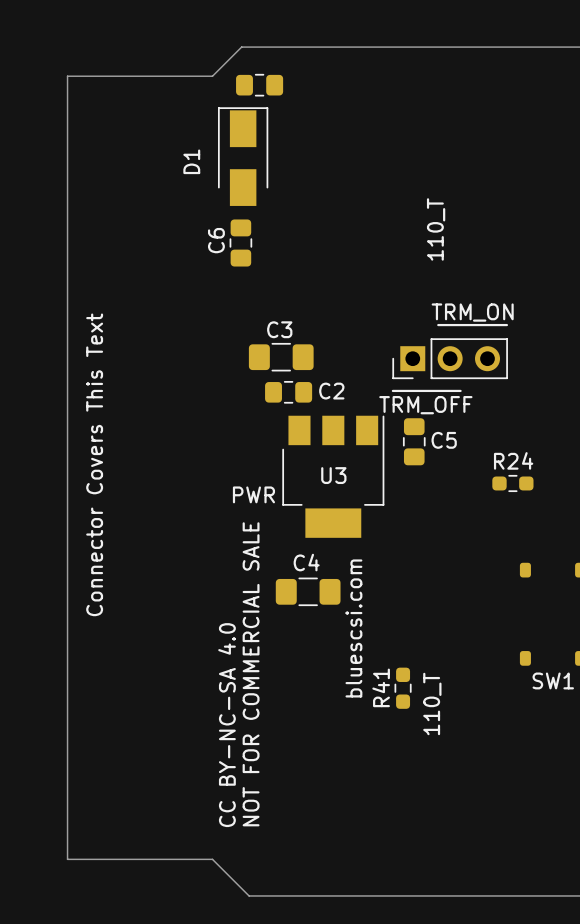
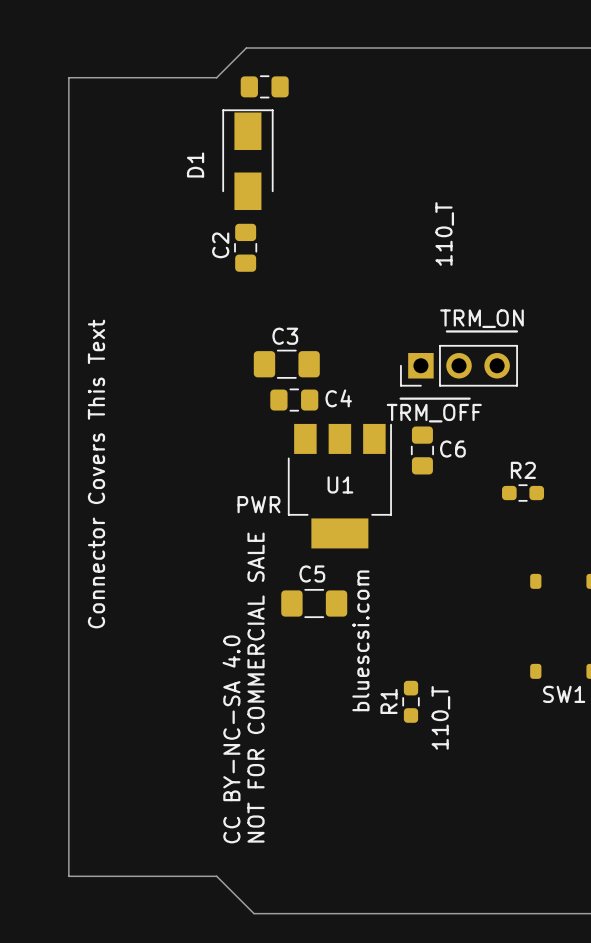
C6 name: C6 (216, 240) -> C2 (220, 245)
C2 name: C2 (331, 391) -> C4 (338, 398)
C5 name: C5 (444, 440) -> C6 (452, 449)
R24 name: R24 (513, 460) -> R2 (523, 470)
U3 name: U3 (333, 475) -> U1 (340, 484)
C4 name: C4 (306, 562) -> C5 (312, 573)
R41 name: R41 (381, 687) -> R1 (388, 701)

